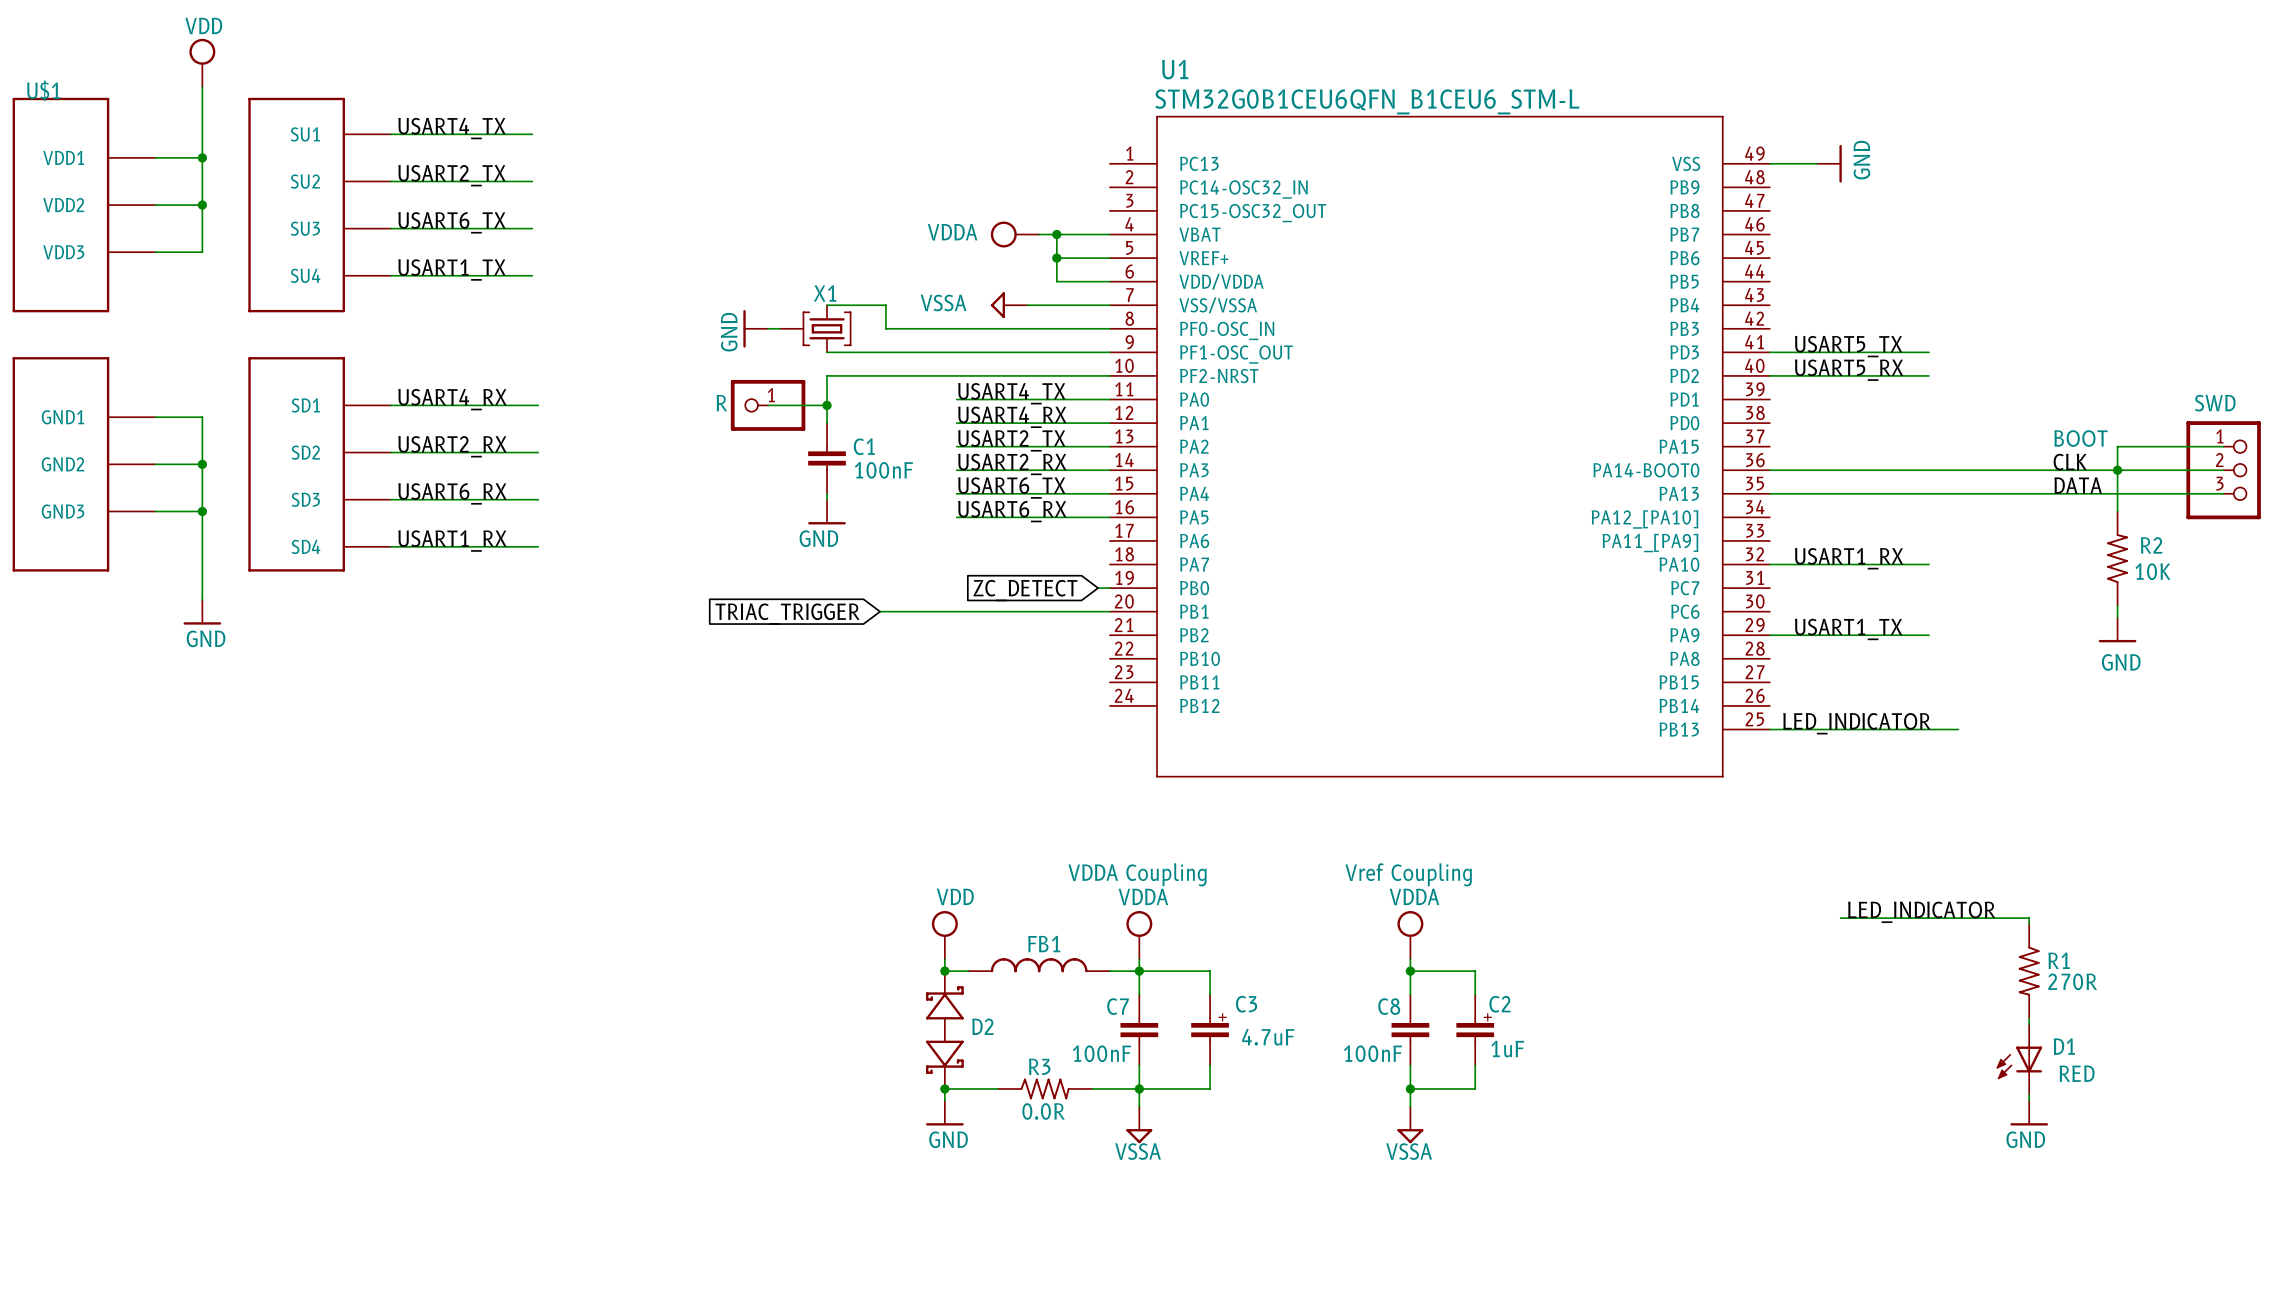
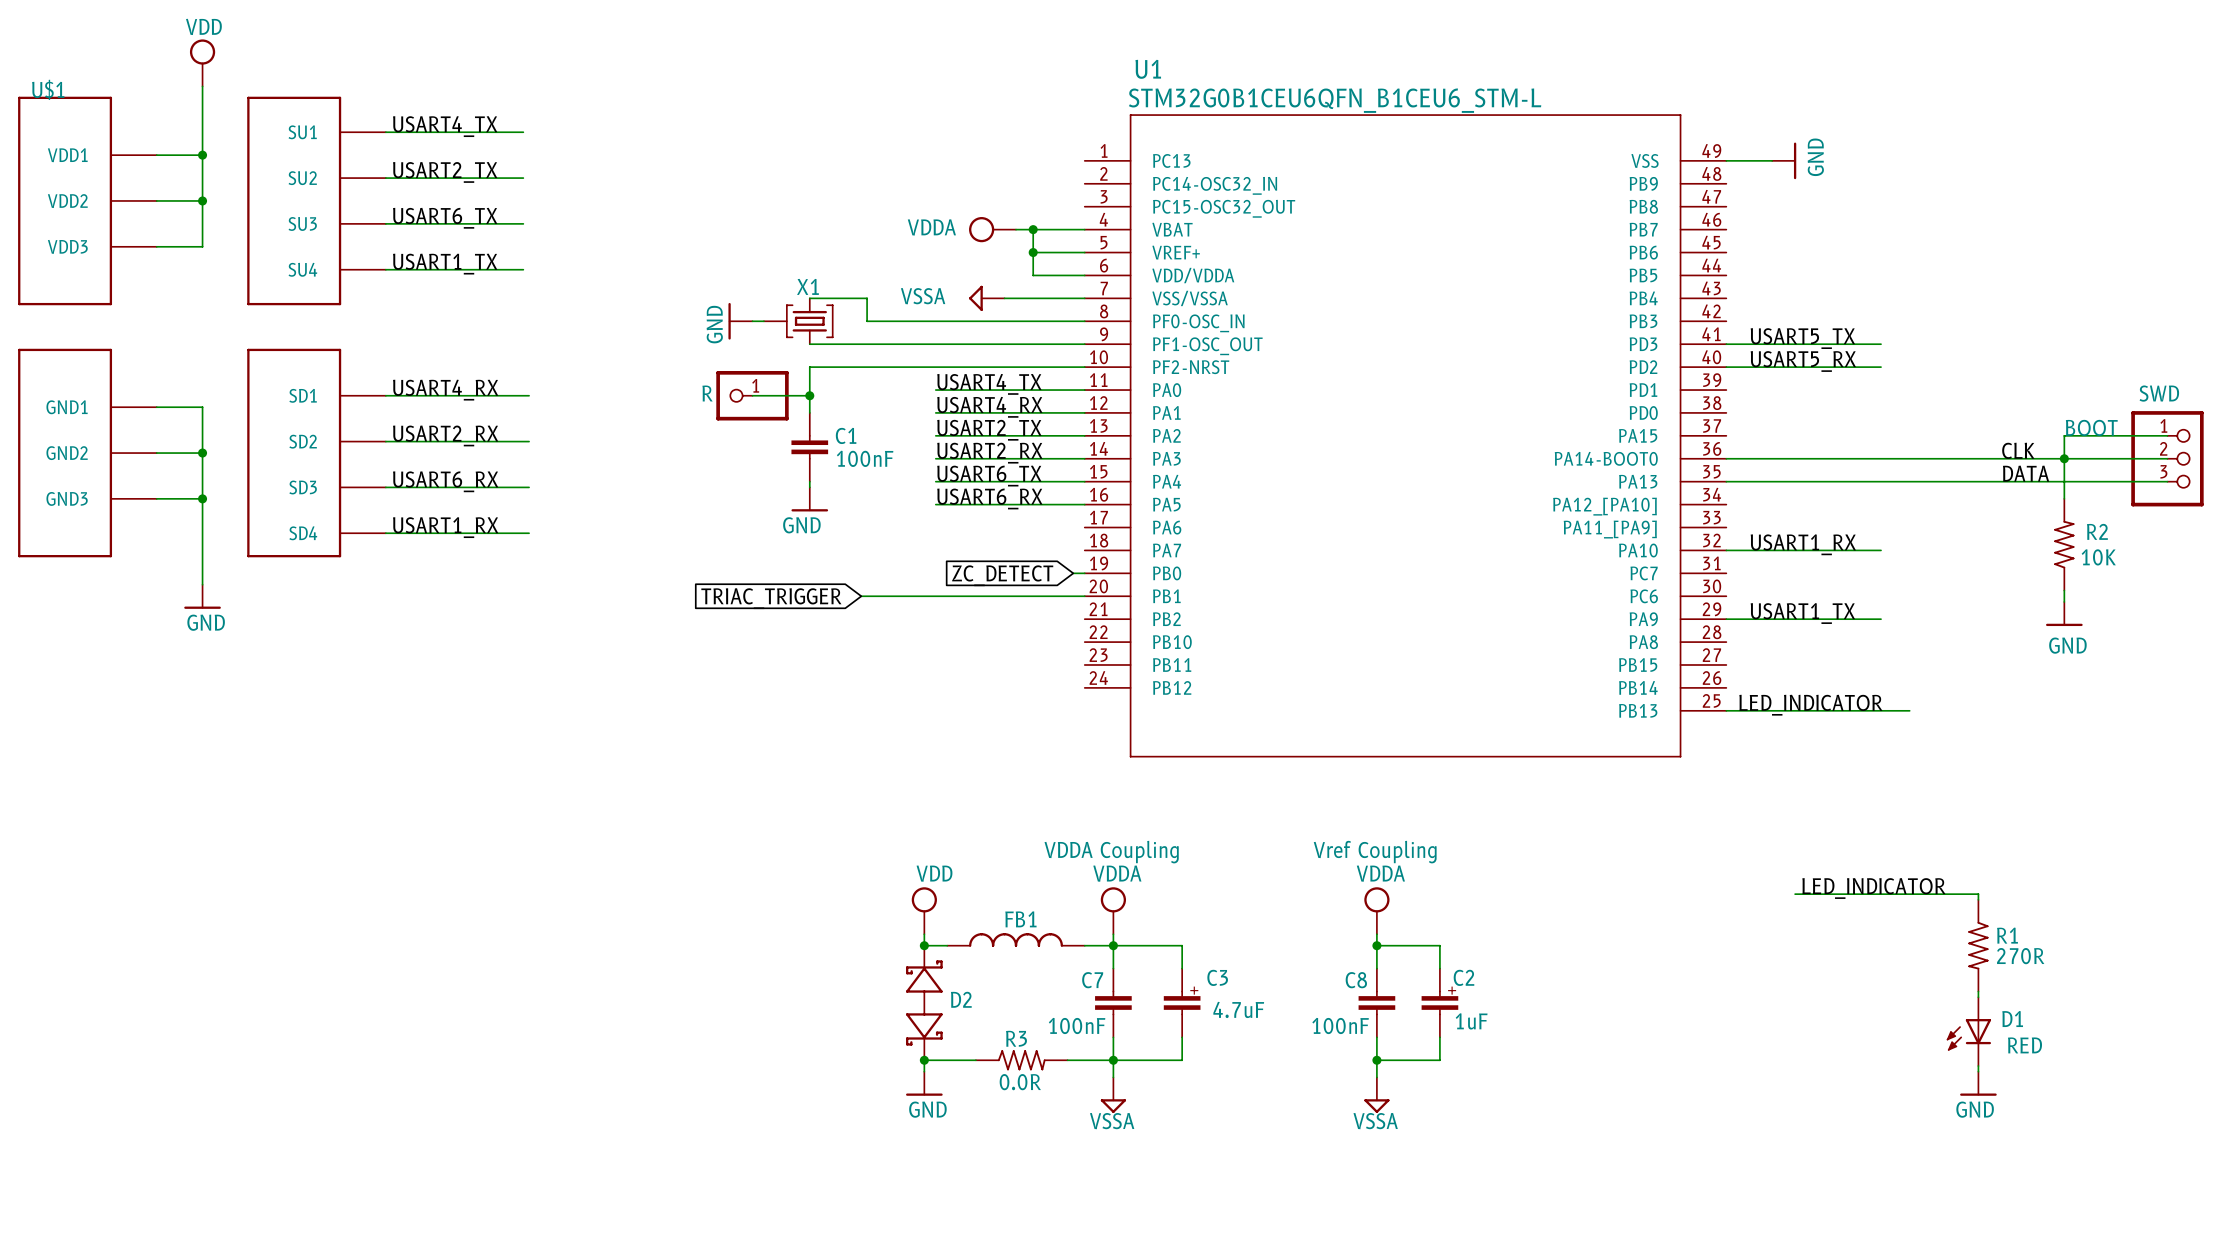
text position: BOOT (2080, 438) -> BOOT (2091, 427)

